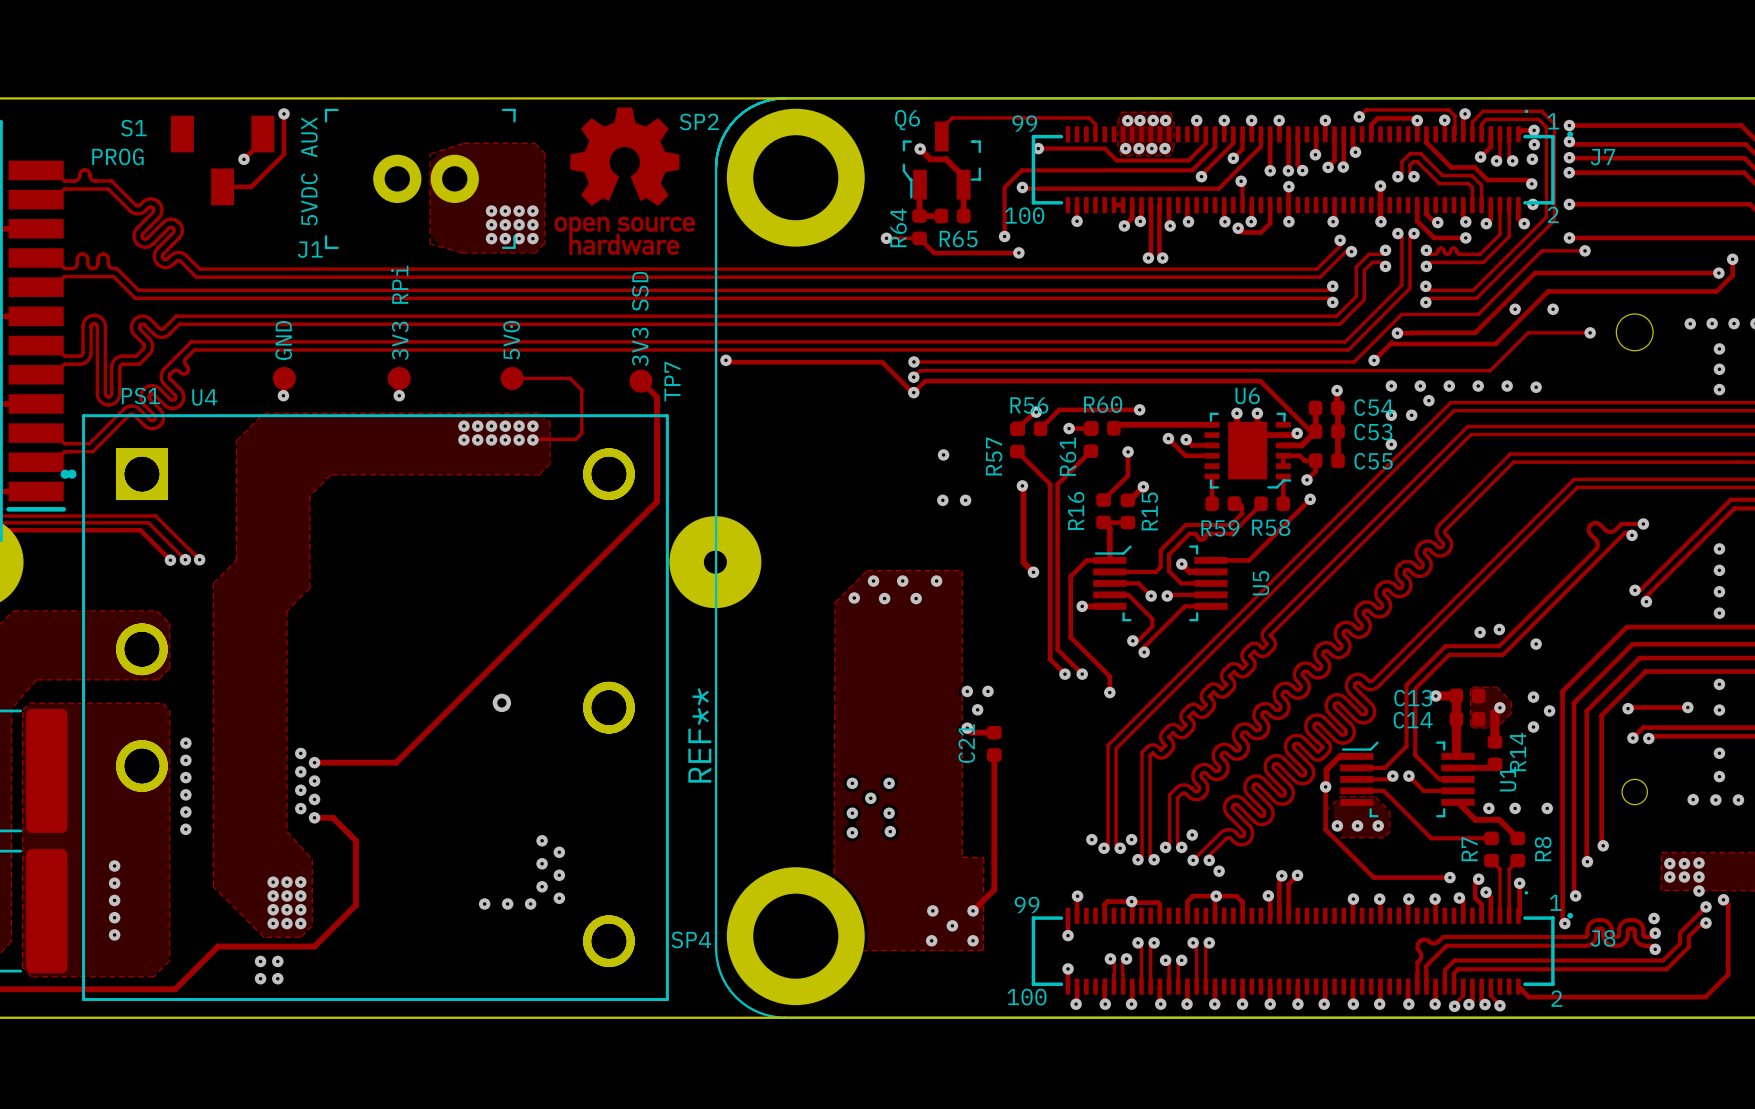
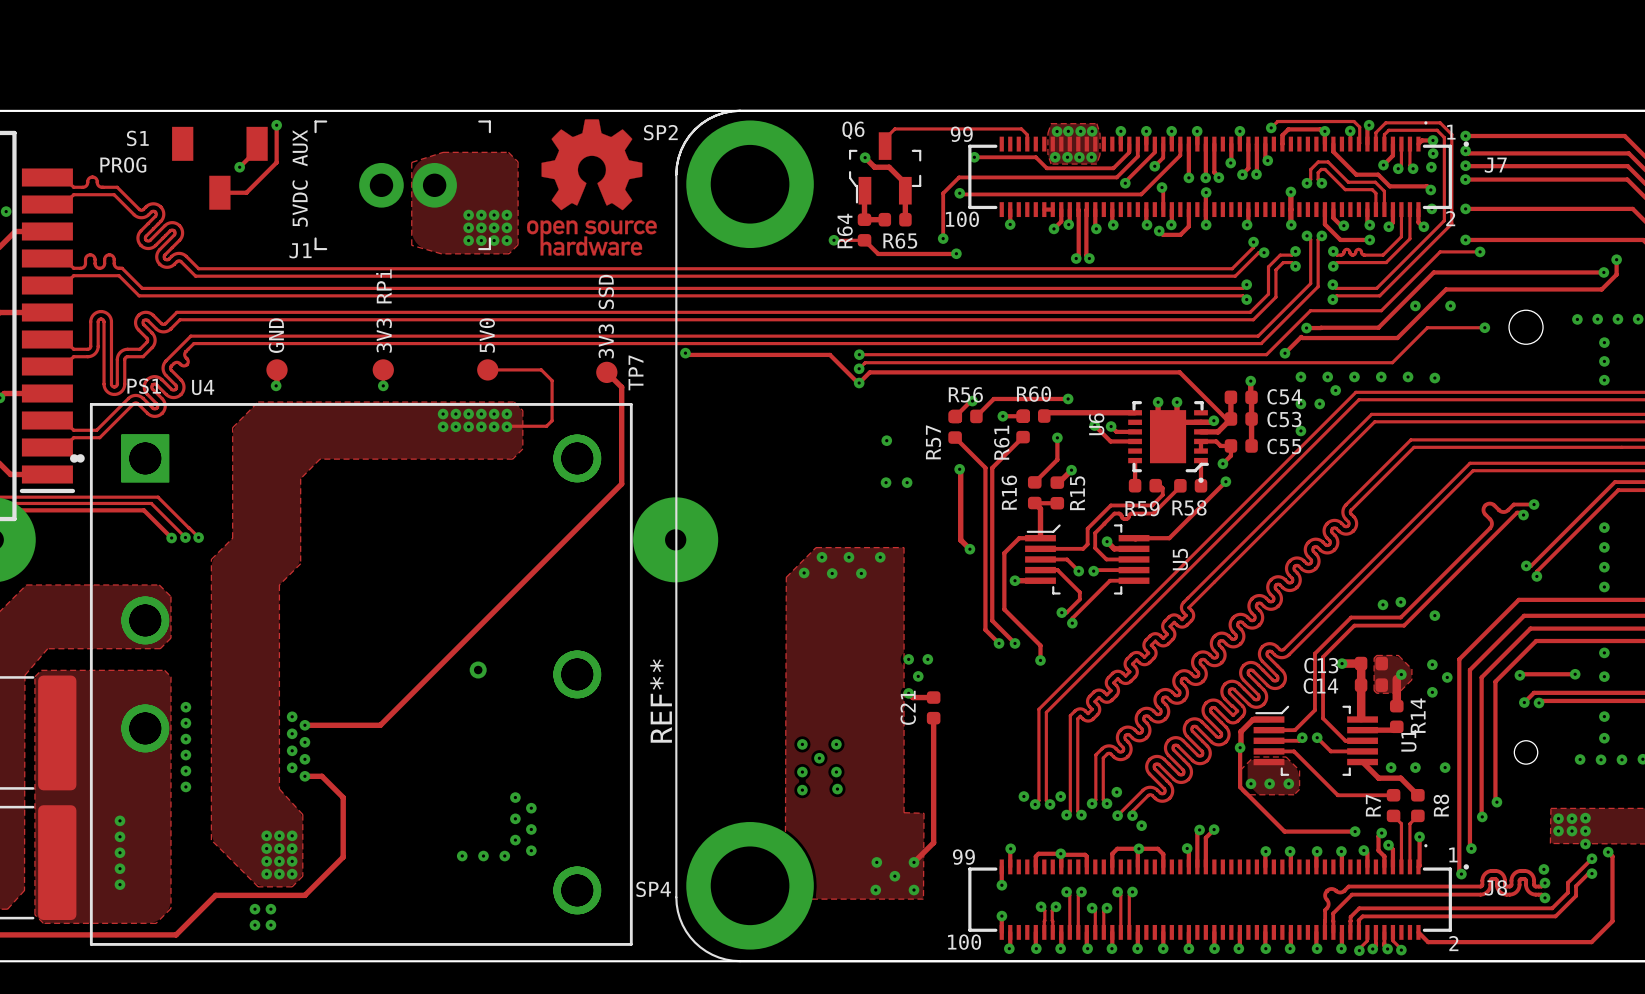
U6 name rotation: 0° (1247, 395) -> 90° counterclockwise (1096, 424)
U6 name position: U6 (1247, 395) -> U6 (1096, 424)
U6 footprint: [1204, 412, 1292, 489] -> [1128, 401, 1209, 483]

